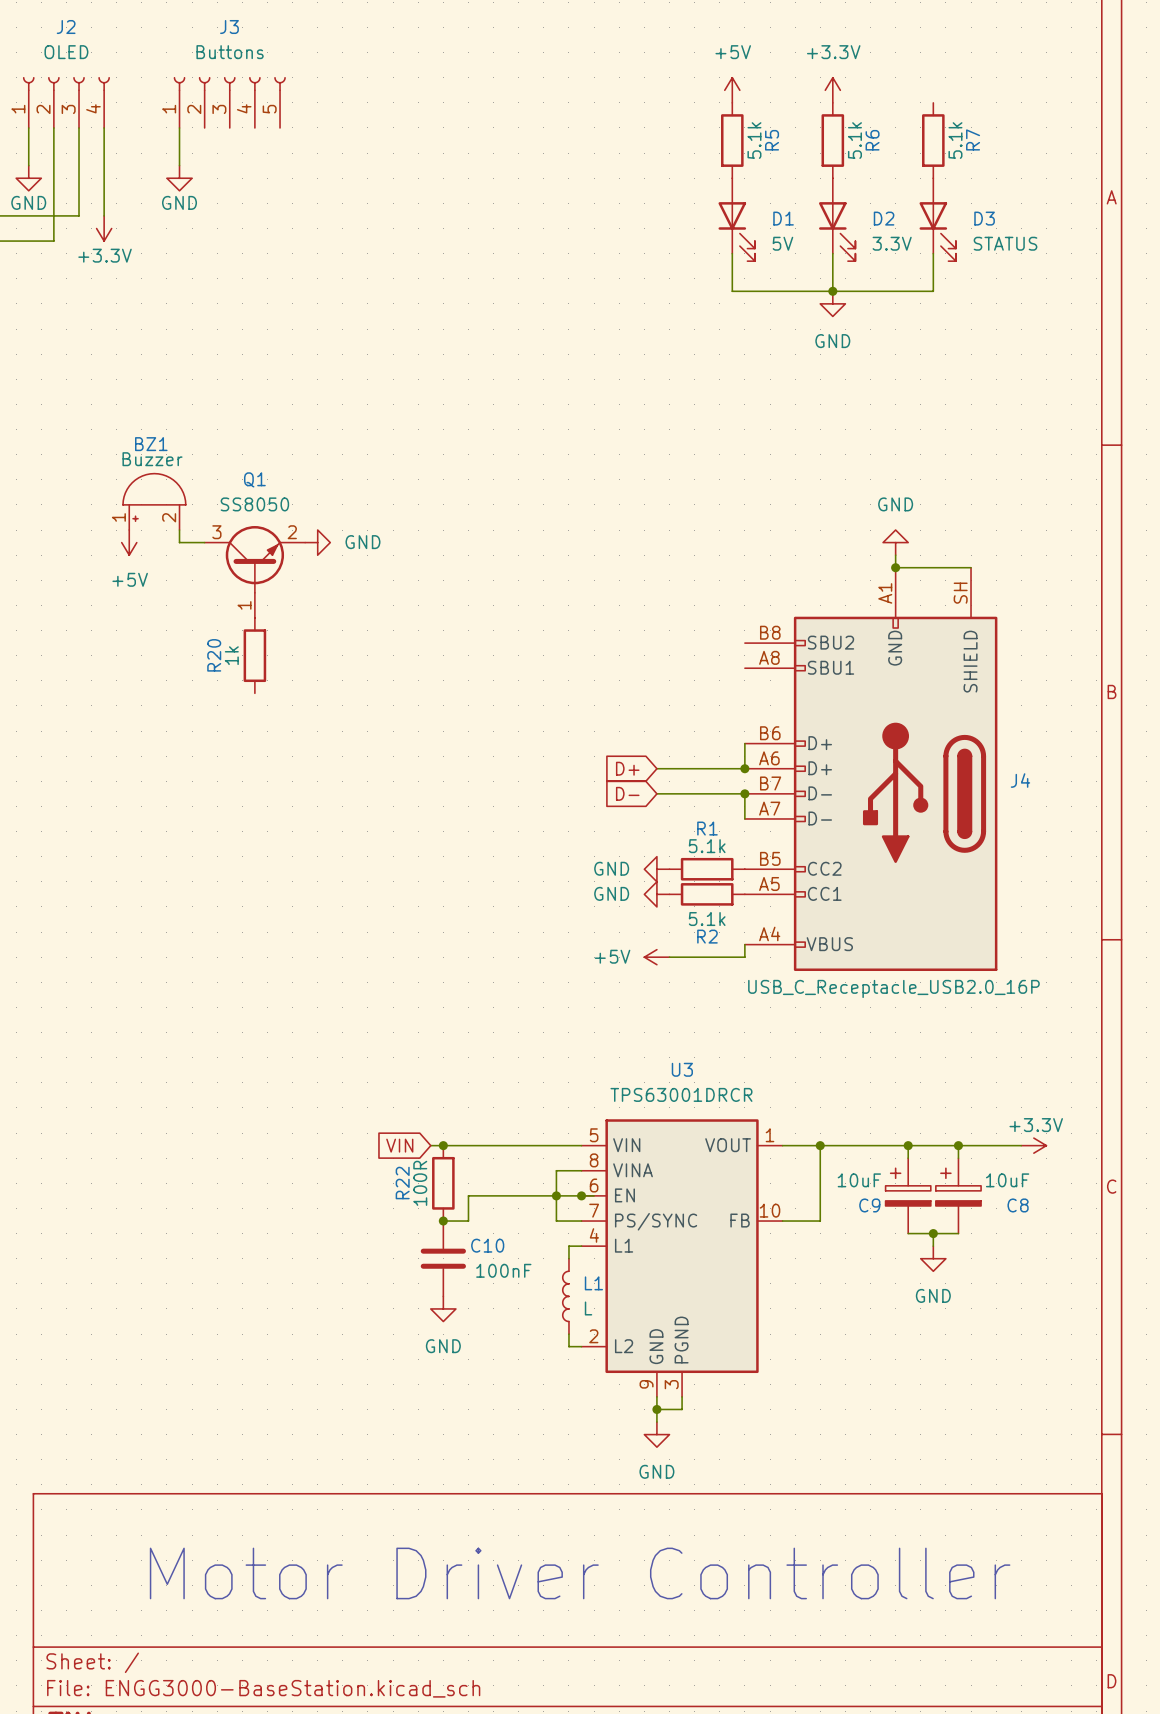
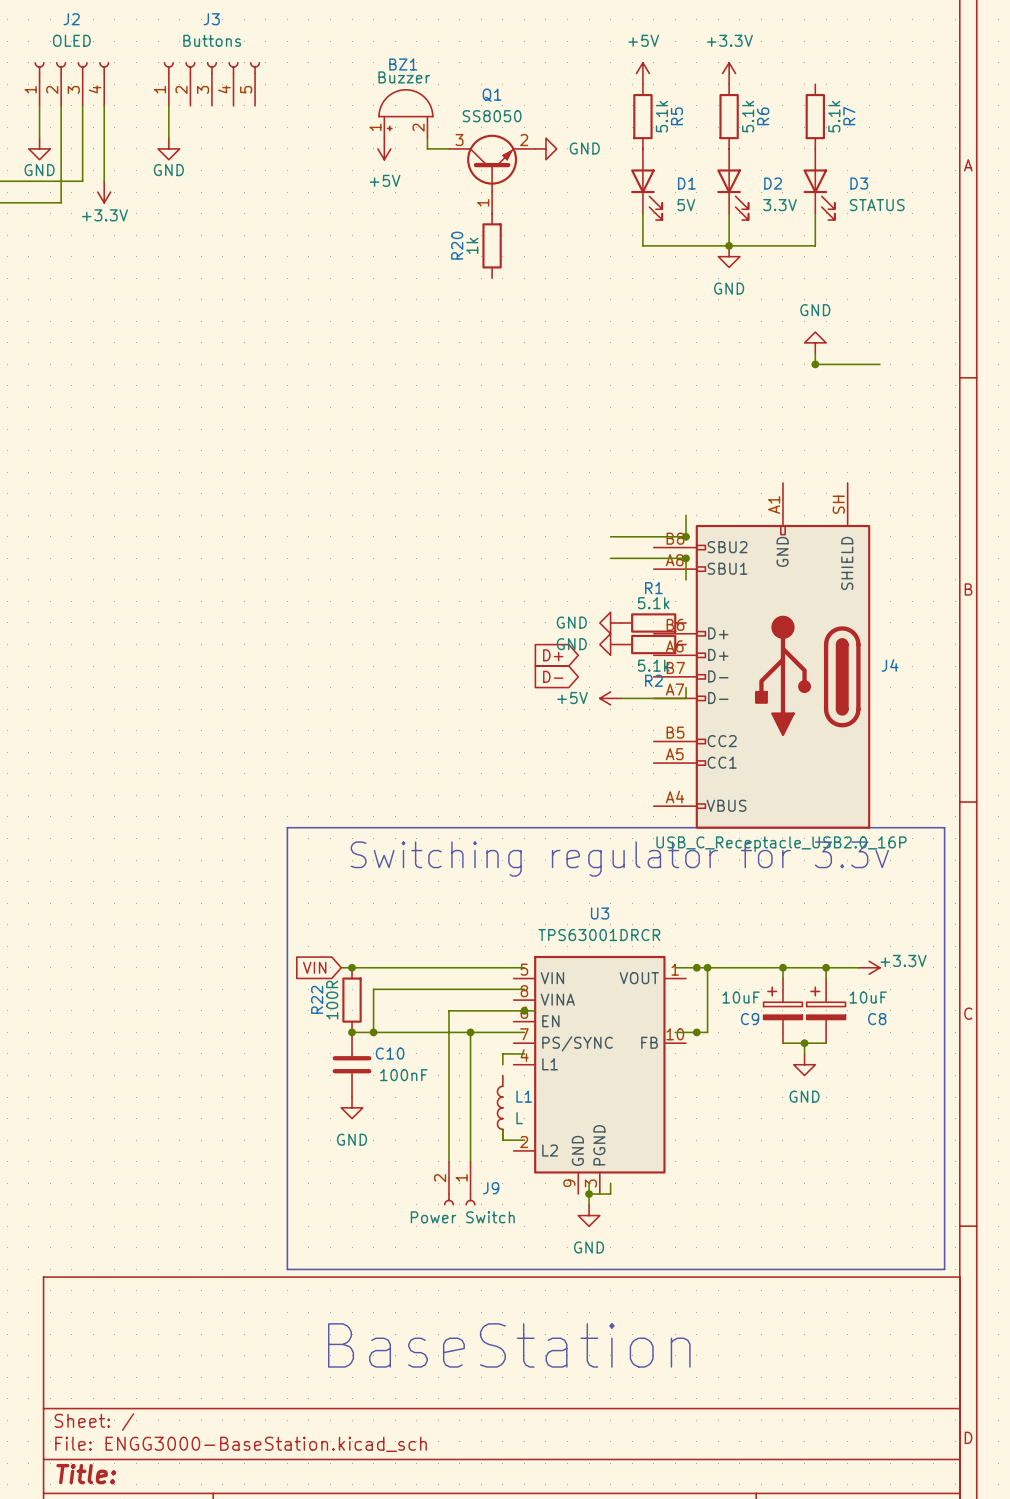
wire: none -> (427, 138) (427, 148) (448, 148)
power symbol: none -> +5V (384, 148)
power symbol: none -> GND (545, 148)
power symbol: none -> GND (815, 342)
junction: none -> (815, 364)
BZ1 position: (154, 501) -> (405, 113)
wire: (179, 530) (179, 542) (204, 542) -> none
power symbol: +5V (129, 542) -> none
power symbol: GND (317, 542) -> none
power symbol: GND (895, 542) -> none
wire: (895, 555) (895, 567) (971, 567) -> (815, 353) (815, 364) (879, 364)
junction: (895, 567) -> none
Q1 position: (254, 571) -> (492, 174)
junction: none -> (686, 536)
R20 position: (254, 655) -> (492, 245)
junction: none -> (686, 558)
power symbol: none -> GND (610, 622)
wire: (744, 743) (744, 768) (656, 768) -> (686, 515) (686, 536) (610, 536)
power symbol: none -> GND (610, 644)
junction: (744, 768) -> none
wire: (656, 793) (744, 793) (744, 818) -> (610, 558) (686, 558) (686, 579)
junction: (744, 793) -> none
power symbol: GND (656, 869) -> none
R1 position: (707, 869) -> (653, 622)
power symbol: GND (656, 894) -> none
R2 position: (707, 894) -> (653, 644)
wire: (744, 944) (744, 957) (669, 957) -> (686, 687) (686, 698) (621, 698)
power symbol position: +5V (656, 957) -> +5V (610, 698)
line: none -> (287, 827) (944, 827) (944, 1269) (287, 1269) (287, 827)
text: none -> Switching regulator for 3.3v (619, 859)
wire: none -> (341, 967) (524, 967)
junction: none -> (352, 967)
wire: none -> (675, 967) (858, 967)
junction: none -> (696, 967)
junction: none -> (707, 967)
global label position: VIN (399, 1145) -> VIN (314, 967)
wire: (430, 1145) (581, 1145) -> none
junction: (443, 1145) -> none
wire: (782, 1145) (1021, 1145) -> none
wire: (820, 1145) (820, 1221) (782, 1221) -> (707, 967) (707, 1032) (675, 1032)
junction: (820, 1145) -> none
wire: (908, 1145) (908, 1158) -> (782, 967) (782, 978)
junction position: (908, 1145) -> (782, 967)
wire: (958, 1145) (958, 1158) -> (826, 967) (826, 978)
junction position: (958, 1145) -> (826, 967)
power symbol position: +3.3V (1033, 1145) -> +3.3V (869, 967)
wire: none -> (524, 989) (373, 989) (373, 1032)
wire: (581, 1170) (556, 1170) (556, 1221) (581, 1221) -> none
R22 position: (443, 1183) -> (352, 1000)
wire: none -> (535, 1010) (448, 1010) (448, 1161)
junction: (556, 1195) -> none
junction position: (581, 1195) -> (524, 1010)
wire: (594, 1195) (468, 1195) (468, 1221) (443, 1221) -> none
C9 position: (908, 1195) -> (782, 1010)
C8 position: (958, 1195) -> (826, 1010)
wire: none -> (352, 1032) (524, 1032)
junction: none -> (352, 1032)
junction: none -> (373, 1032)
wire: none -> (470, 1032) (470, 1161)
junction: none -> (470, 1032)
junction: none -> (696, 1032)
junction: (443, 1221) -> none
wire: none -> (524, 1053) (502, 1053) (502, 1064)
wire: (908, 1233) (958, 1233) -> (782, 1043) (826, 1043)
wire: (933, 1233) (933, 1246) -> (804, 1043) (804, 1053)
junction position: (933, 1233) -> (804, 1043)
wire: (581, 1246) (568, 1246) (568, 1258) -> none
C10 position: (443, 1258) -> (352, 1064)
power symbol position: GND (933, 1258) -> GND (804, 1064)
power symbol position: GND (443, 1308) -> GND (352, 1107)
wire: none -> (502, 1129) (502, 1140) (524, 1140)
wire: (568, 1334) (568, 1346) (581, 1346) -> none
J9: none -> Power Switch (459, 1183)
wire: (656, 1396) (656, 1422) -> (589, 1183) (589, 1204)
wire: (682, 1396) (682, 1409) (656, 1409) -> (610, 1183) (610, 1194) (589, 1194)
junction position: (656, 1409) -> (589, 1194)
power symbol position: GND (656, 1434) -> GND (589, 1215)
text: Motor Driver Controller (580, 1573) -> BaseStation (509, 1345)

